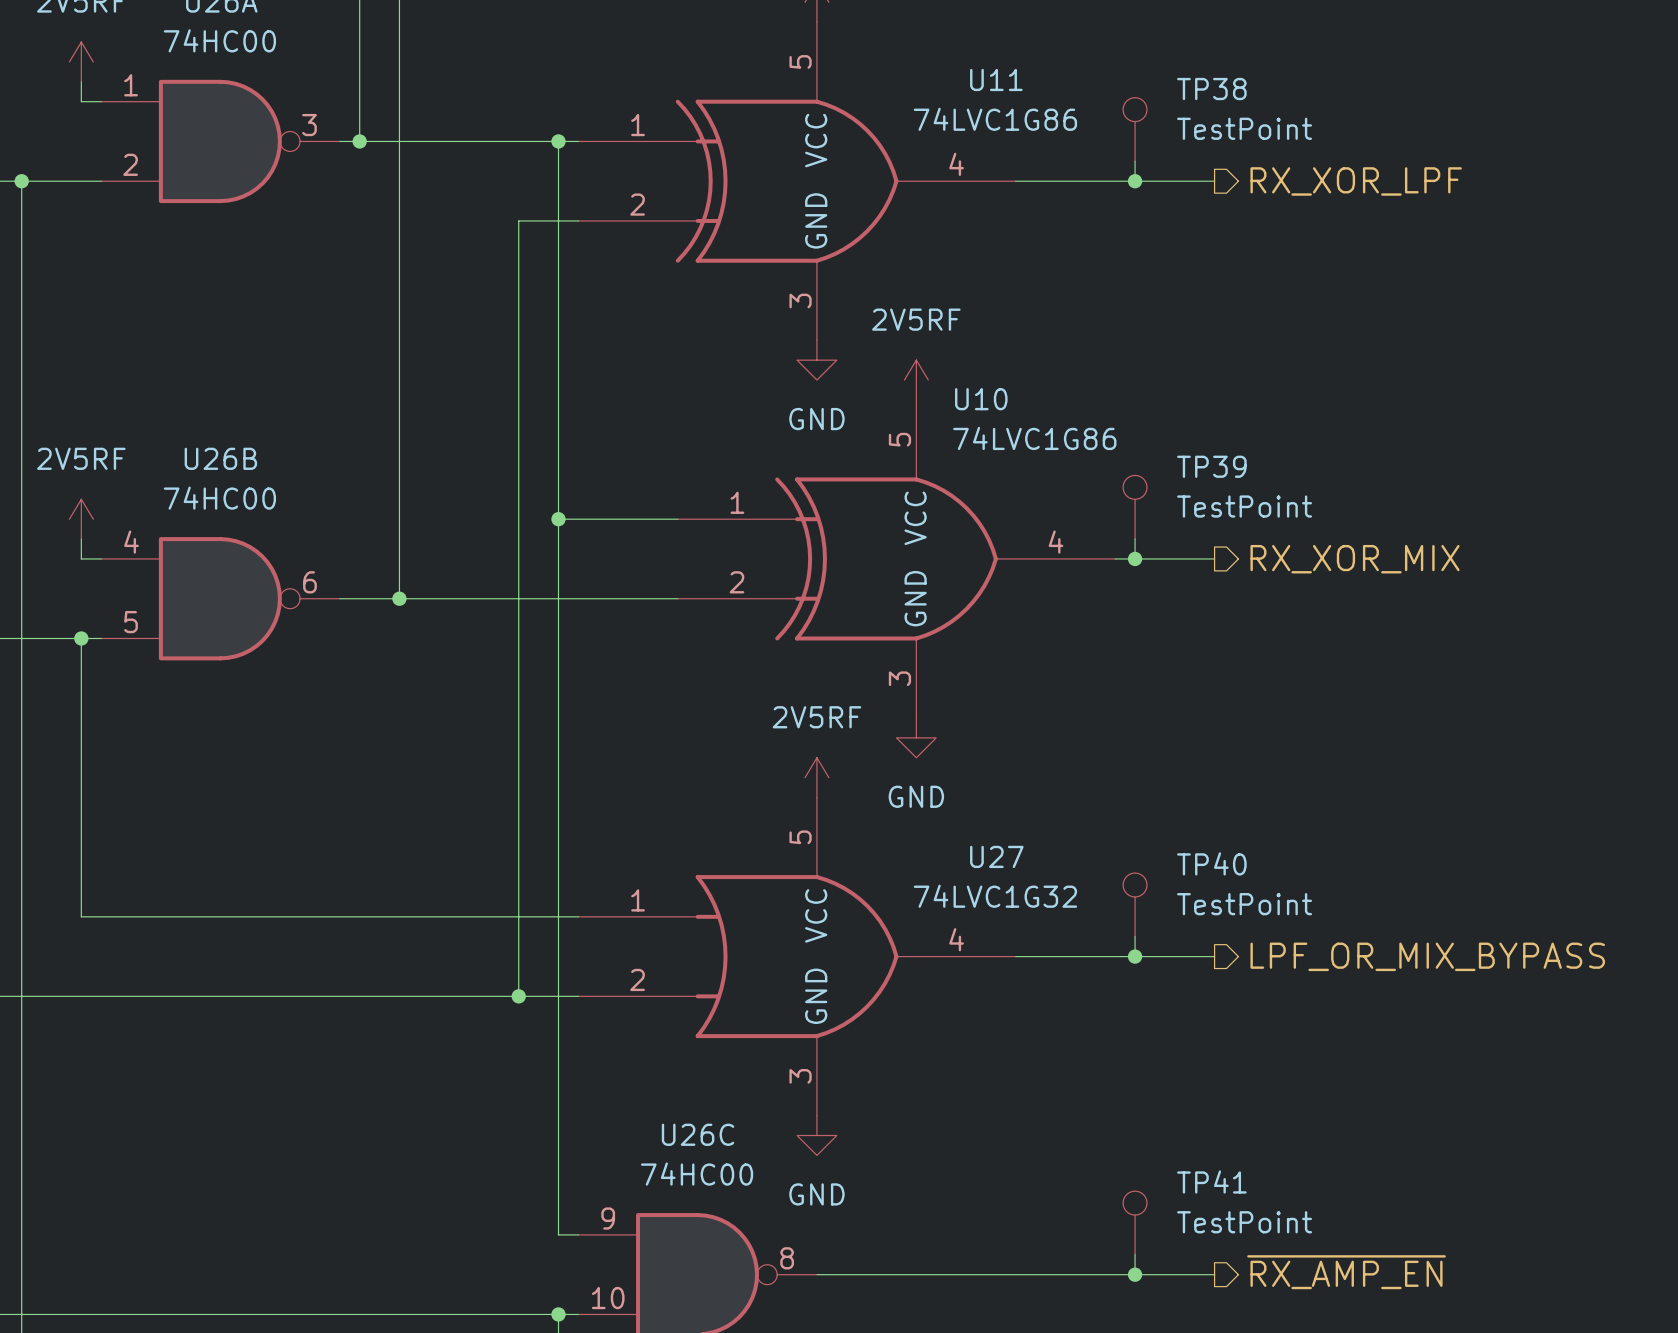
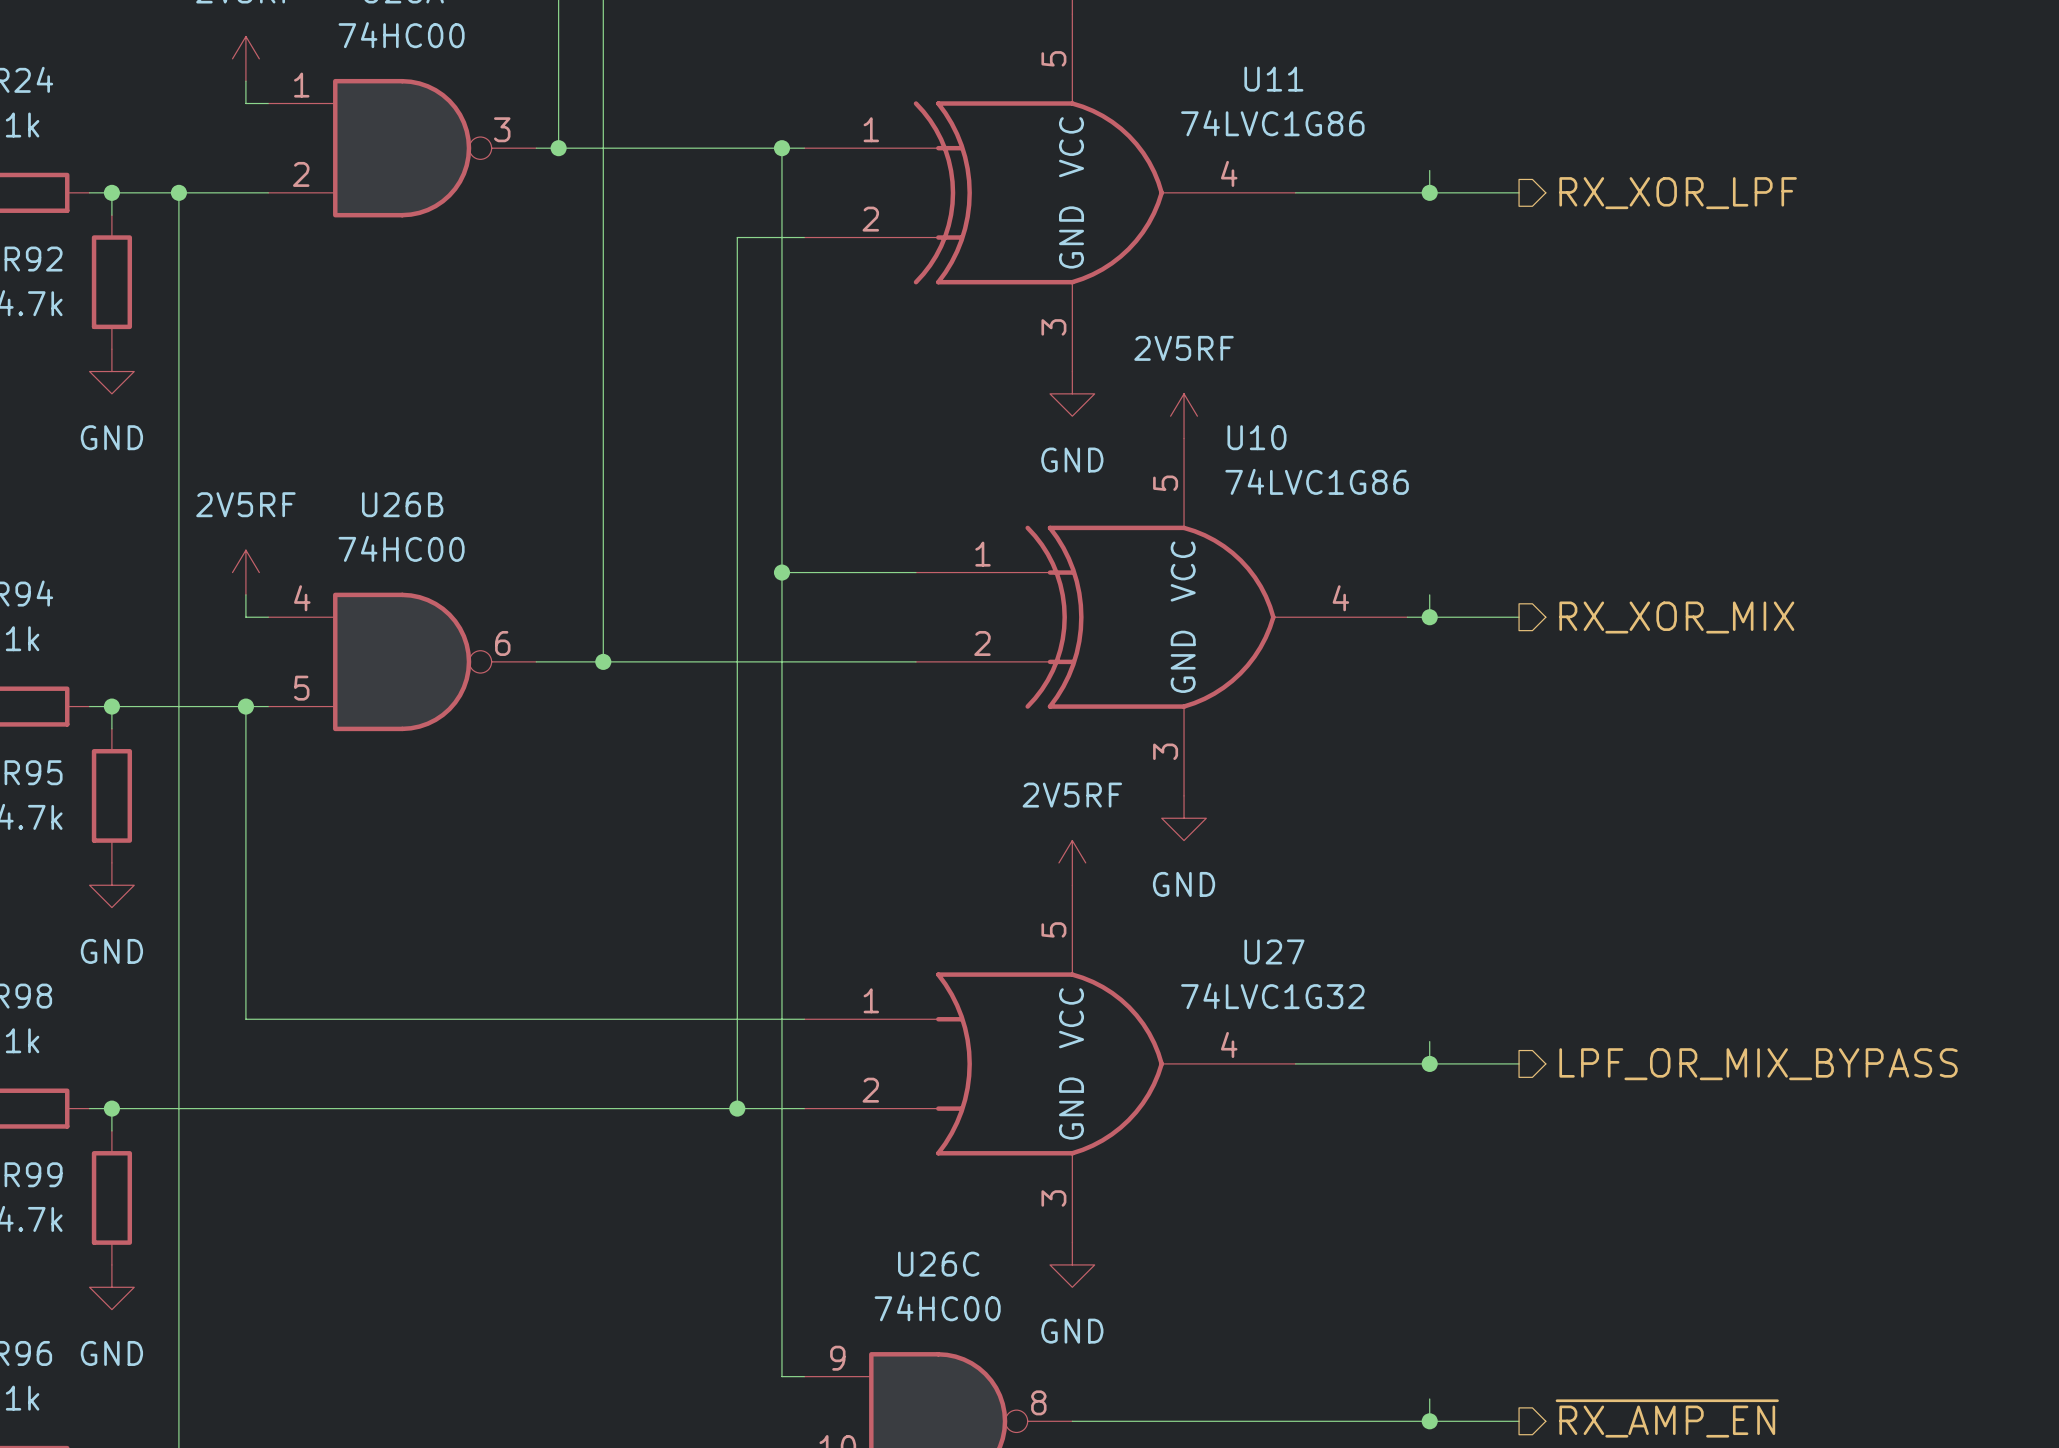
TP38: TestPoint (1135, 129) -> none
TP39: TestPoint (1135, 507) -> none
TP40: TestPoint (1135, 904) -> none
TP41: TestPoint (1135, 1223) -> none

